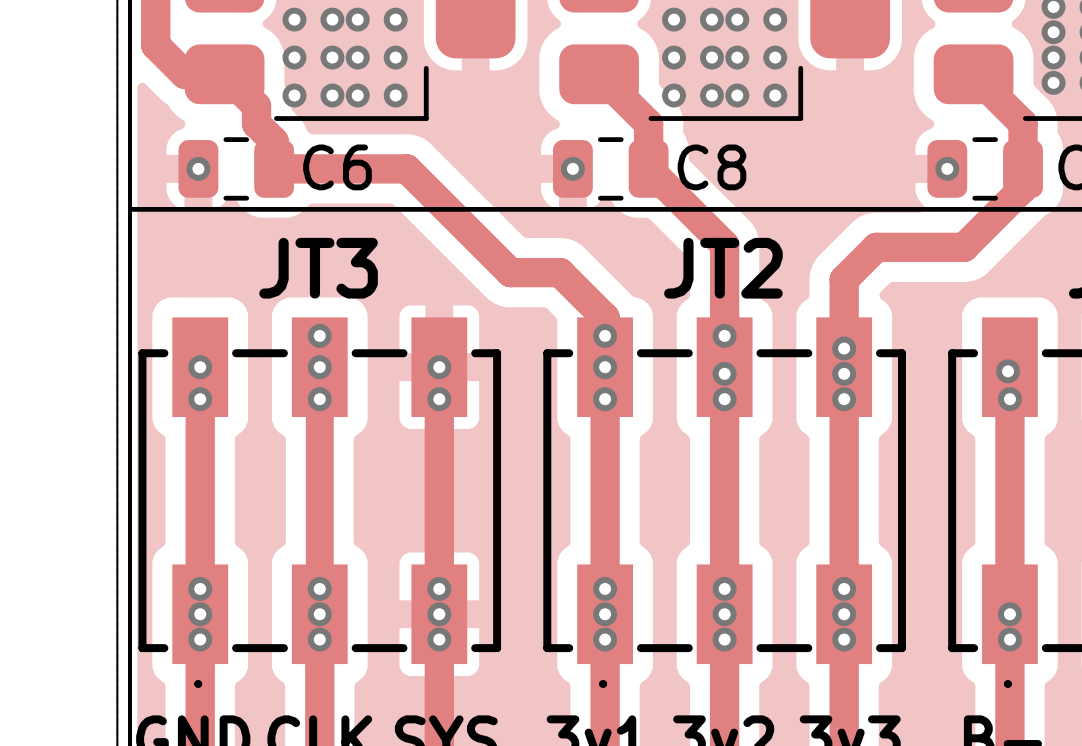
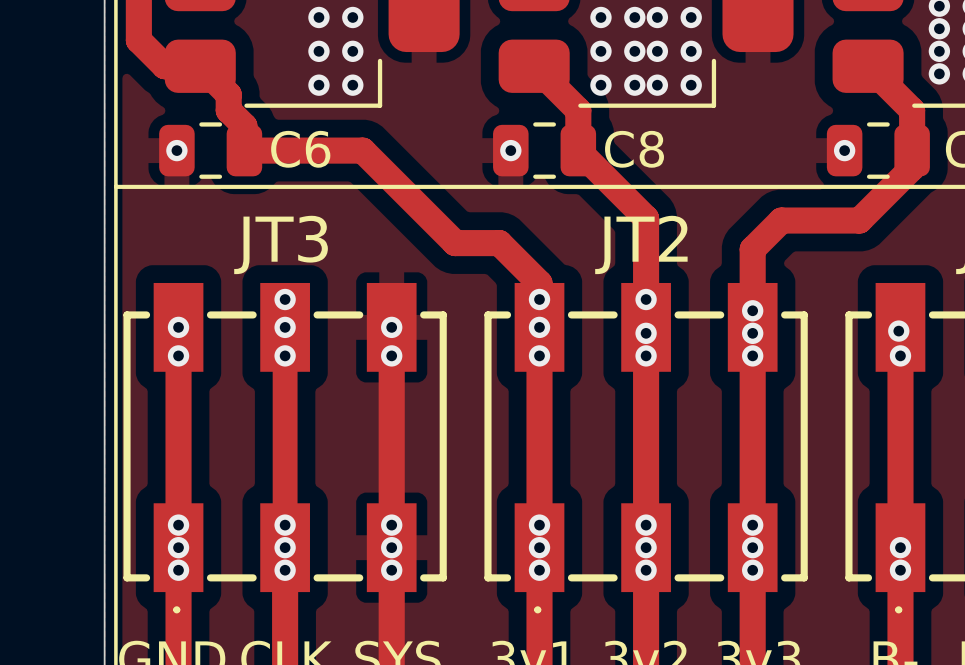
via: (294, 19) -> none
via: (332, 19) -> none
via: (294, 57) -> none
via: (332, 57) -> none
via: (294, 95) -> none
via: (332, 95) -> none

